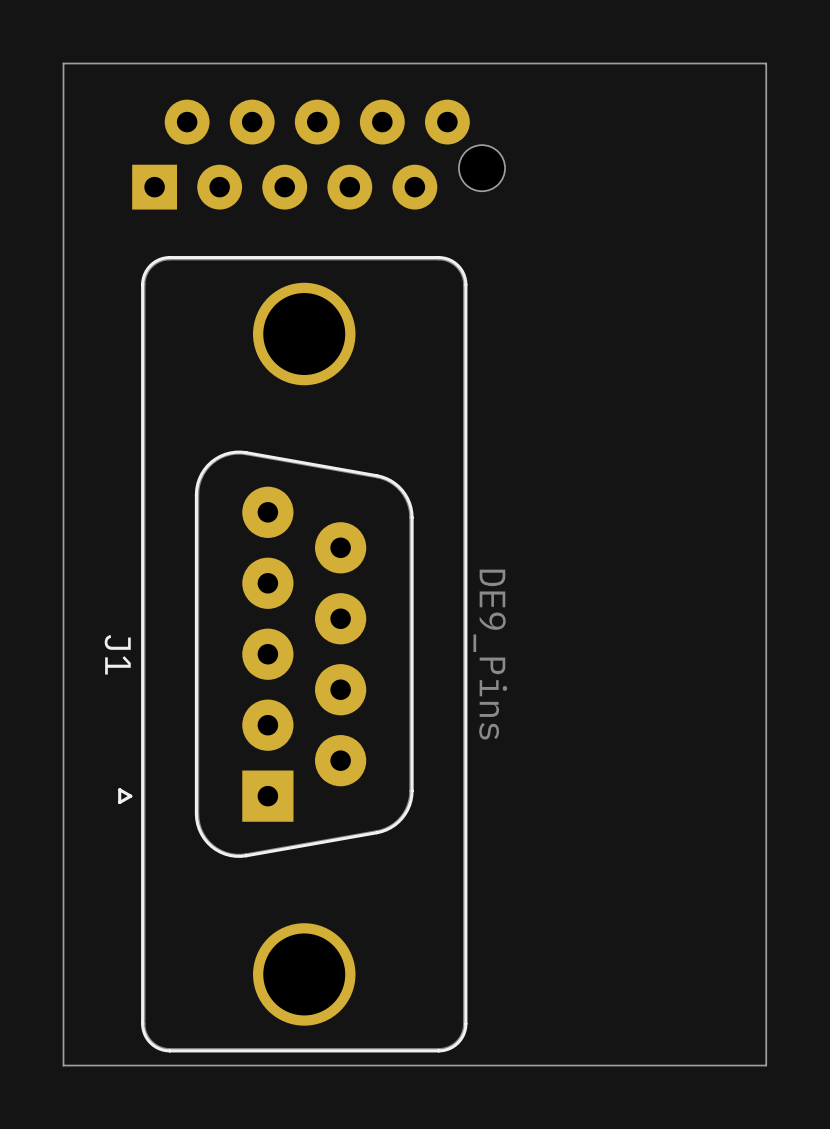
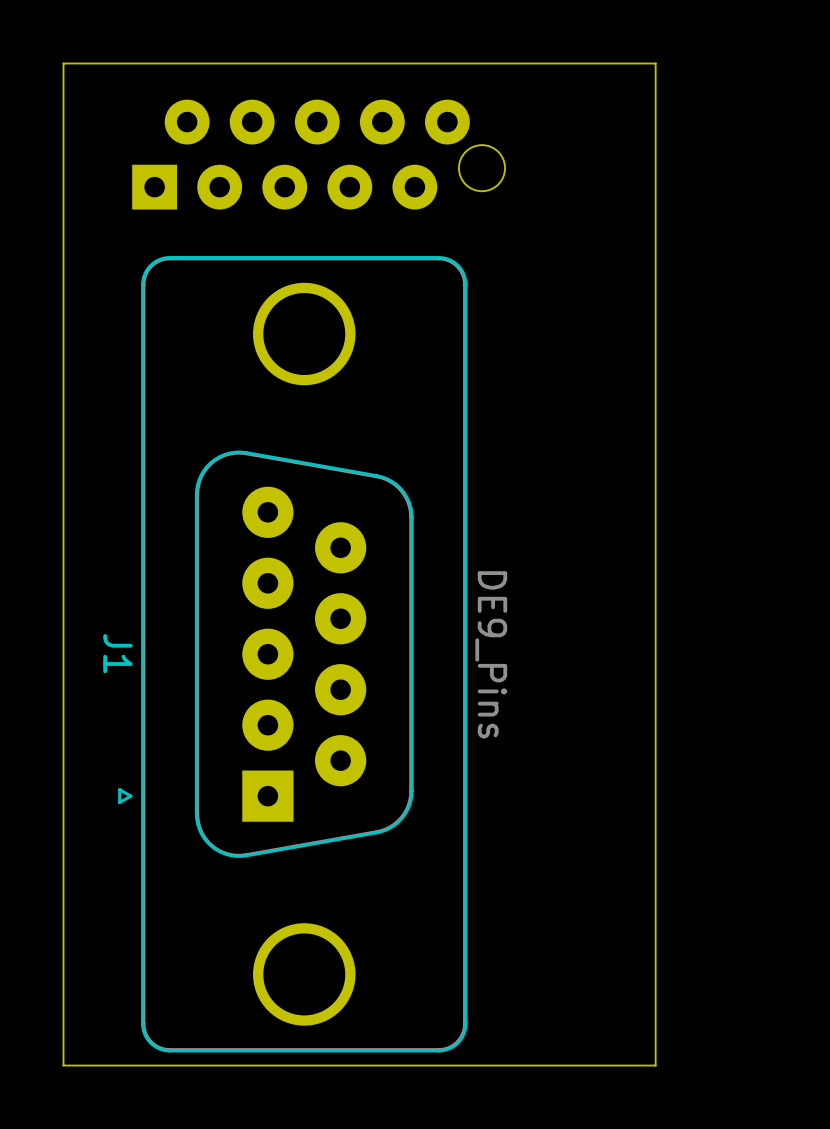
board edge: (655, 63) (766, 63) (766, 1065) (655, 1065) -> (655, 63) (655, 1065)

